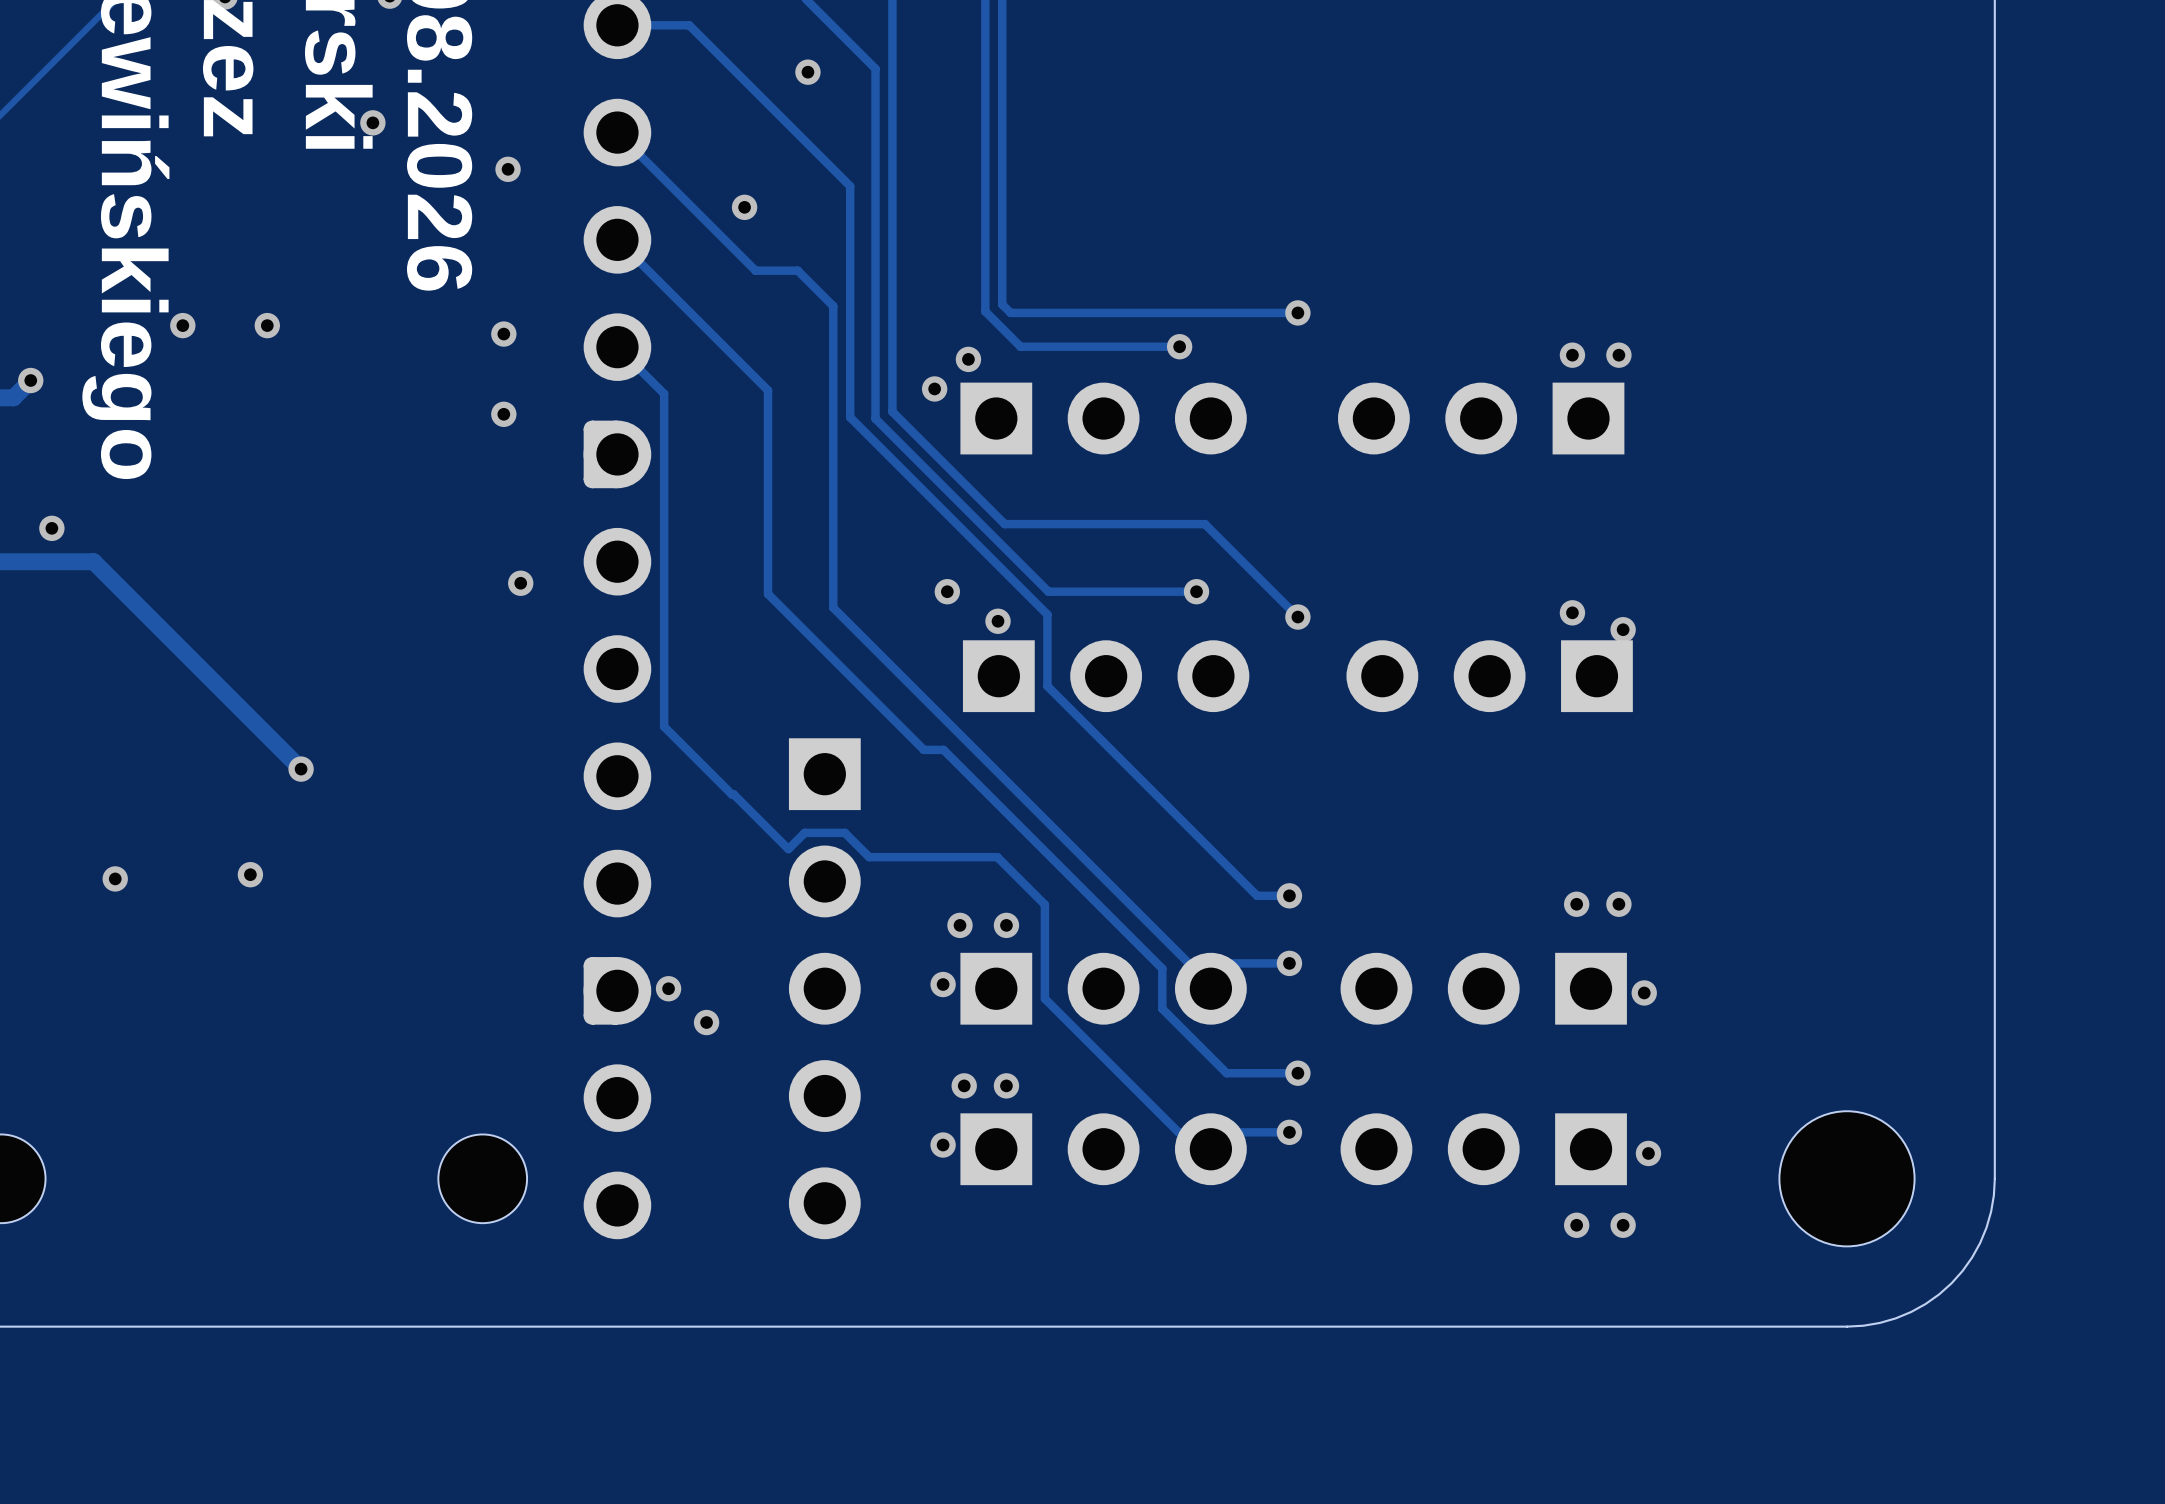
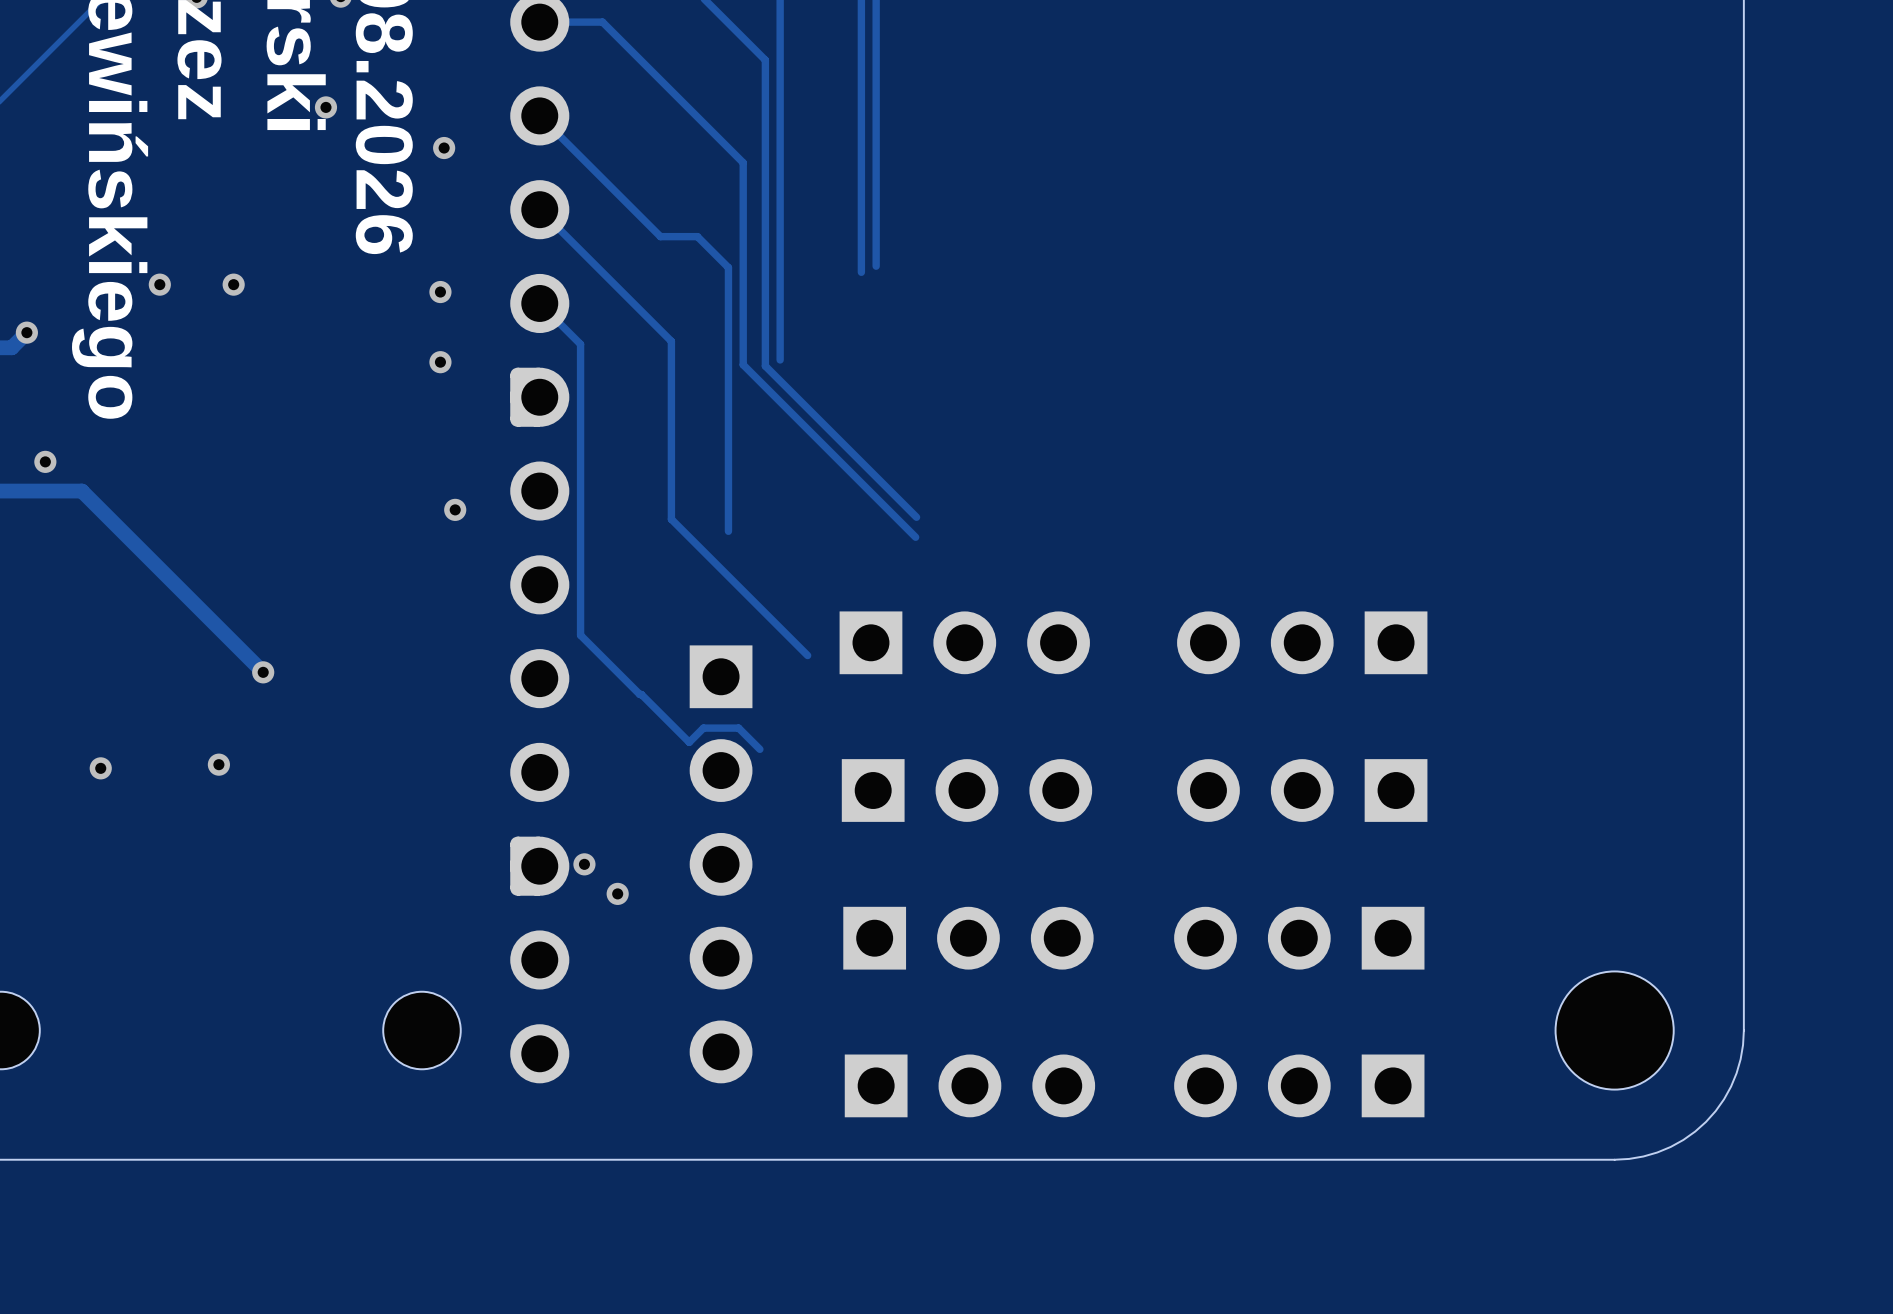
via: (807, 72) -> none
via: (744, 207) -> none
track: (1002, 304) (1010, 312) (1297, 312) -> none
track: (985, 311) (1020, 346) (1179, 346) -> none
via: (1297, 312) -> none
via: (1179, 346) -> none
via: (1572, 355) -> none
via: (1618, 355) -> none
via: (968, 359) -> none
via: (934, 388) -> none
track: (892, 411) (1004, 524) (1204, 524) (1297, 617) -> none
part: (1103, 418) -> none
part: (1481, 418) -> none
via: (947, 591) -> none
track: (1196, 591) (1048, 591) -> none
via: (1196, 591) -> none
track: (833, 607) (1188, 963) (1289, 963) -> none
via: (1572, 612) -> none
track: (1047, 614) (1047, 686) (1257, 895) (1289, 895) -> none
via: (1297, 617) -> none
via: (998, 621) -> none
via: (1623, 629) -> none
part position: (1106, 676) -> (964, 642)
part position: (1489, 676) -> (1302, 642)
track: (923, 749) (943, 749) (1162, 968) (1162, 1008) (1226, 1073) (1297, 1073) -> none
track: (869, 857) (997, 857) (1044, 904) (1044, 998) (1178, 1132) (1289, 1132) -> none
via: (1289, 895) -> none
part: none -> (966, 790)
part: none -> (1302, 790)
via: (1576, 904) -> none
via: (1618, 904) -> none
via: (959, 925) -> none
via: (1006, 925) -> none
via: (1289, 963) -> none
via: (943, 984) -> none
part: (1103, 988) -> none
part: (1483, 988) -> none
via: (1644, 992) -> none
part: none -> (968, 938)
via: (1297, 1073) -> none
part: none -> (1299, 938)
via: (964, 1085) -> none
via: (1006, 1085) -> none
via: (1289, 1132) -> none
via: (943, 1145) -> none
part: (1103, 1149) -> none
part: (1483, 1149) -> none
via: (1648, 1153) -> none
via: (1576, 1225) -> none
via: (1623, 1225) -> none
part: none -> (969, 1085)
part: none -> (1299, 1085)

